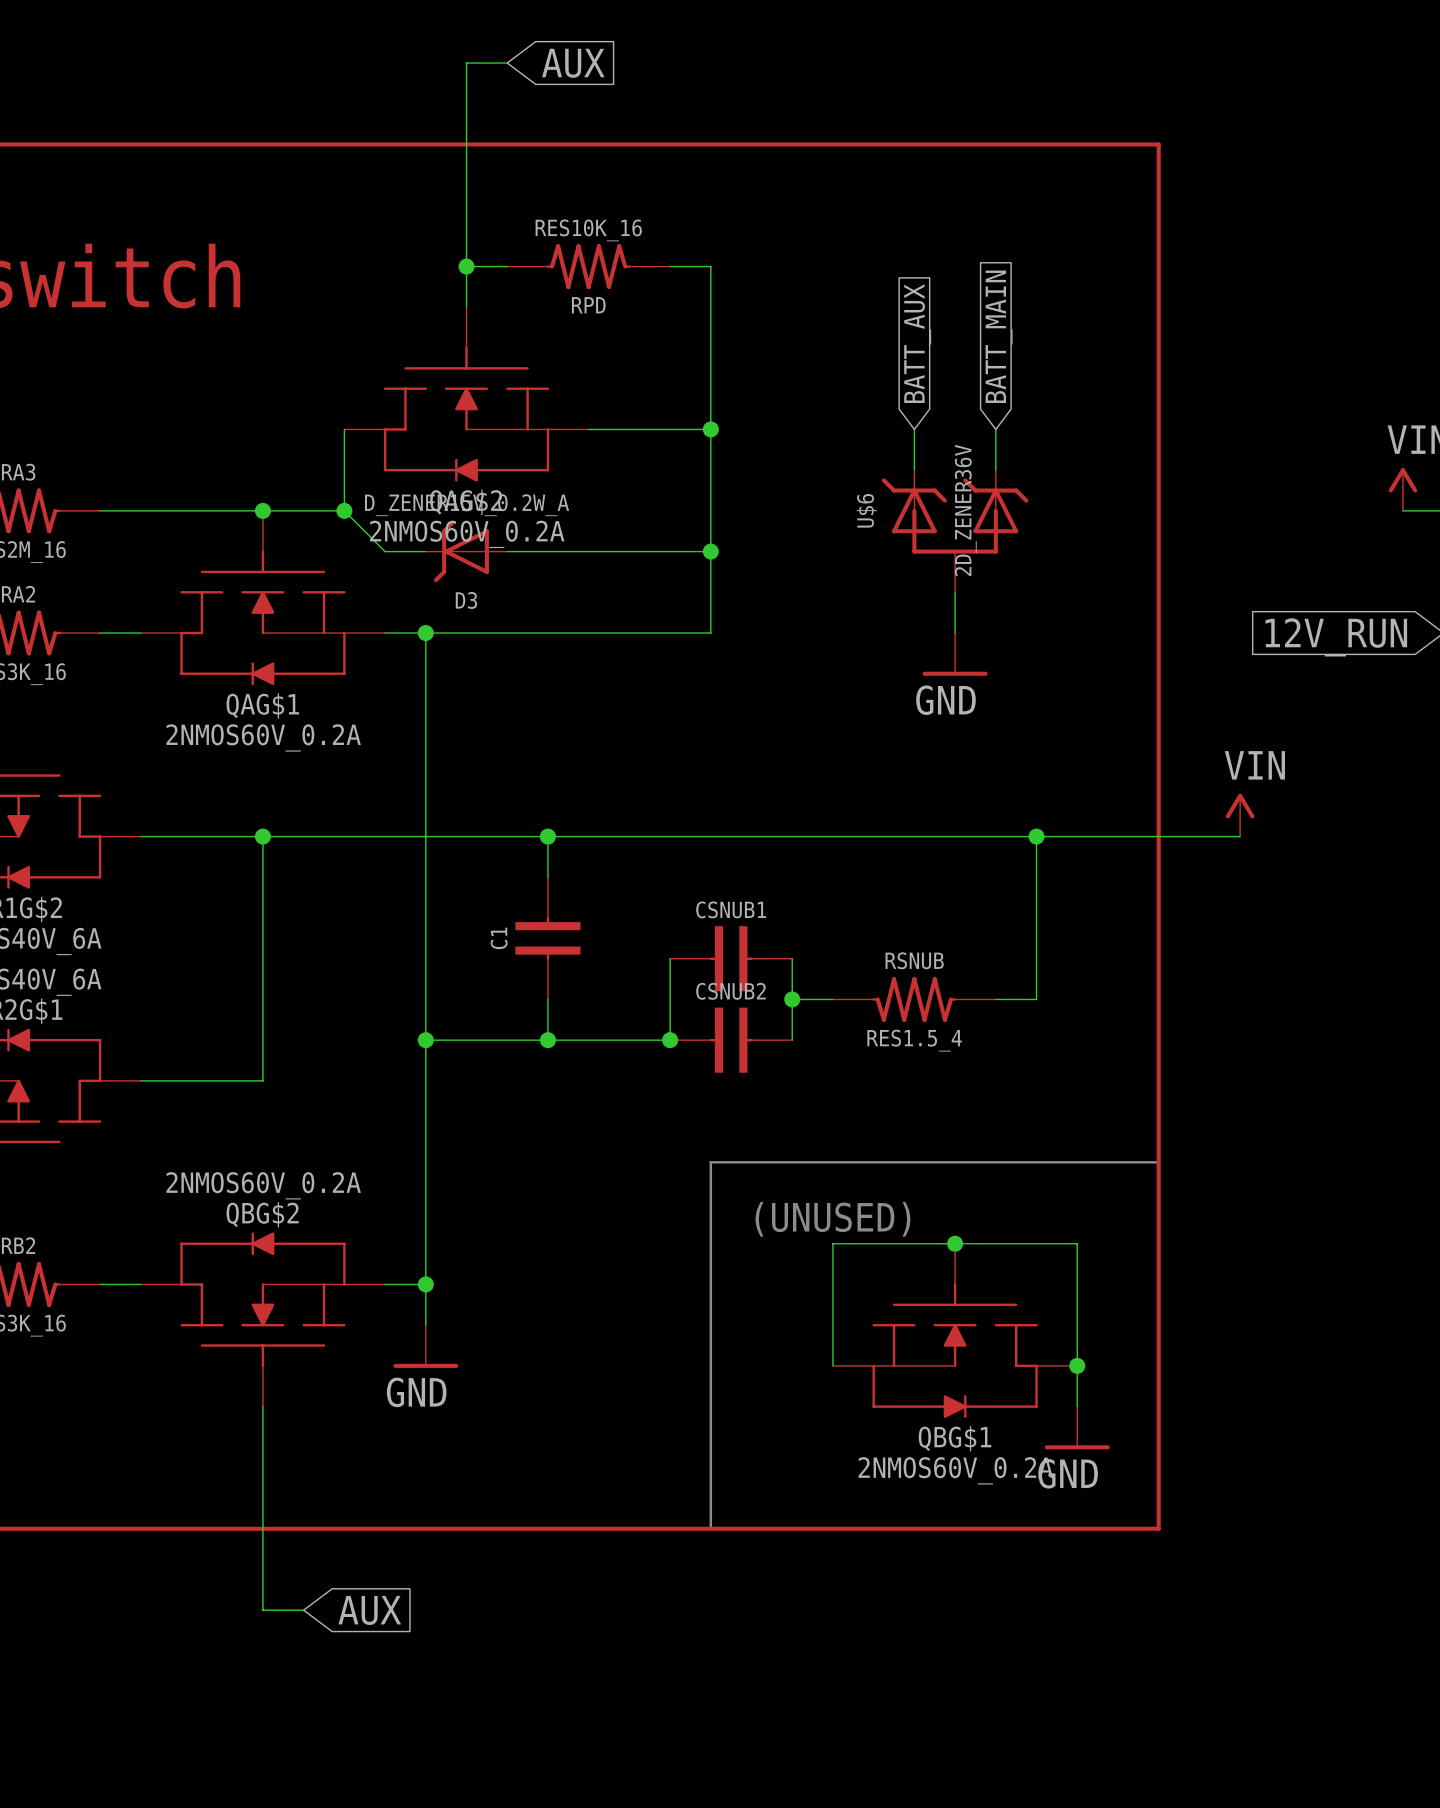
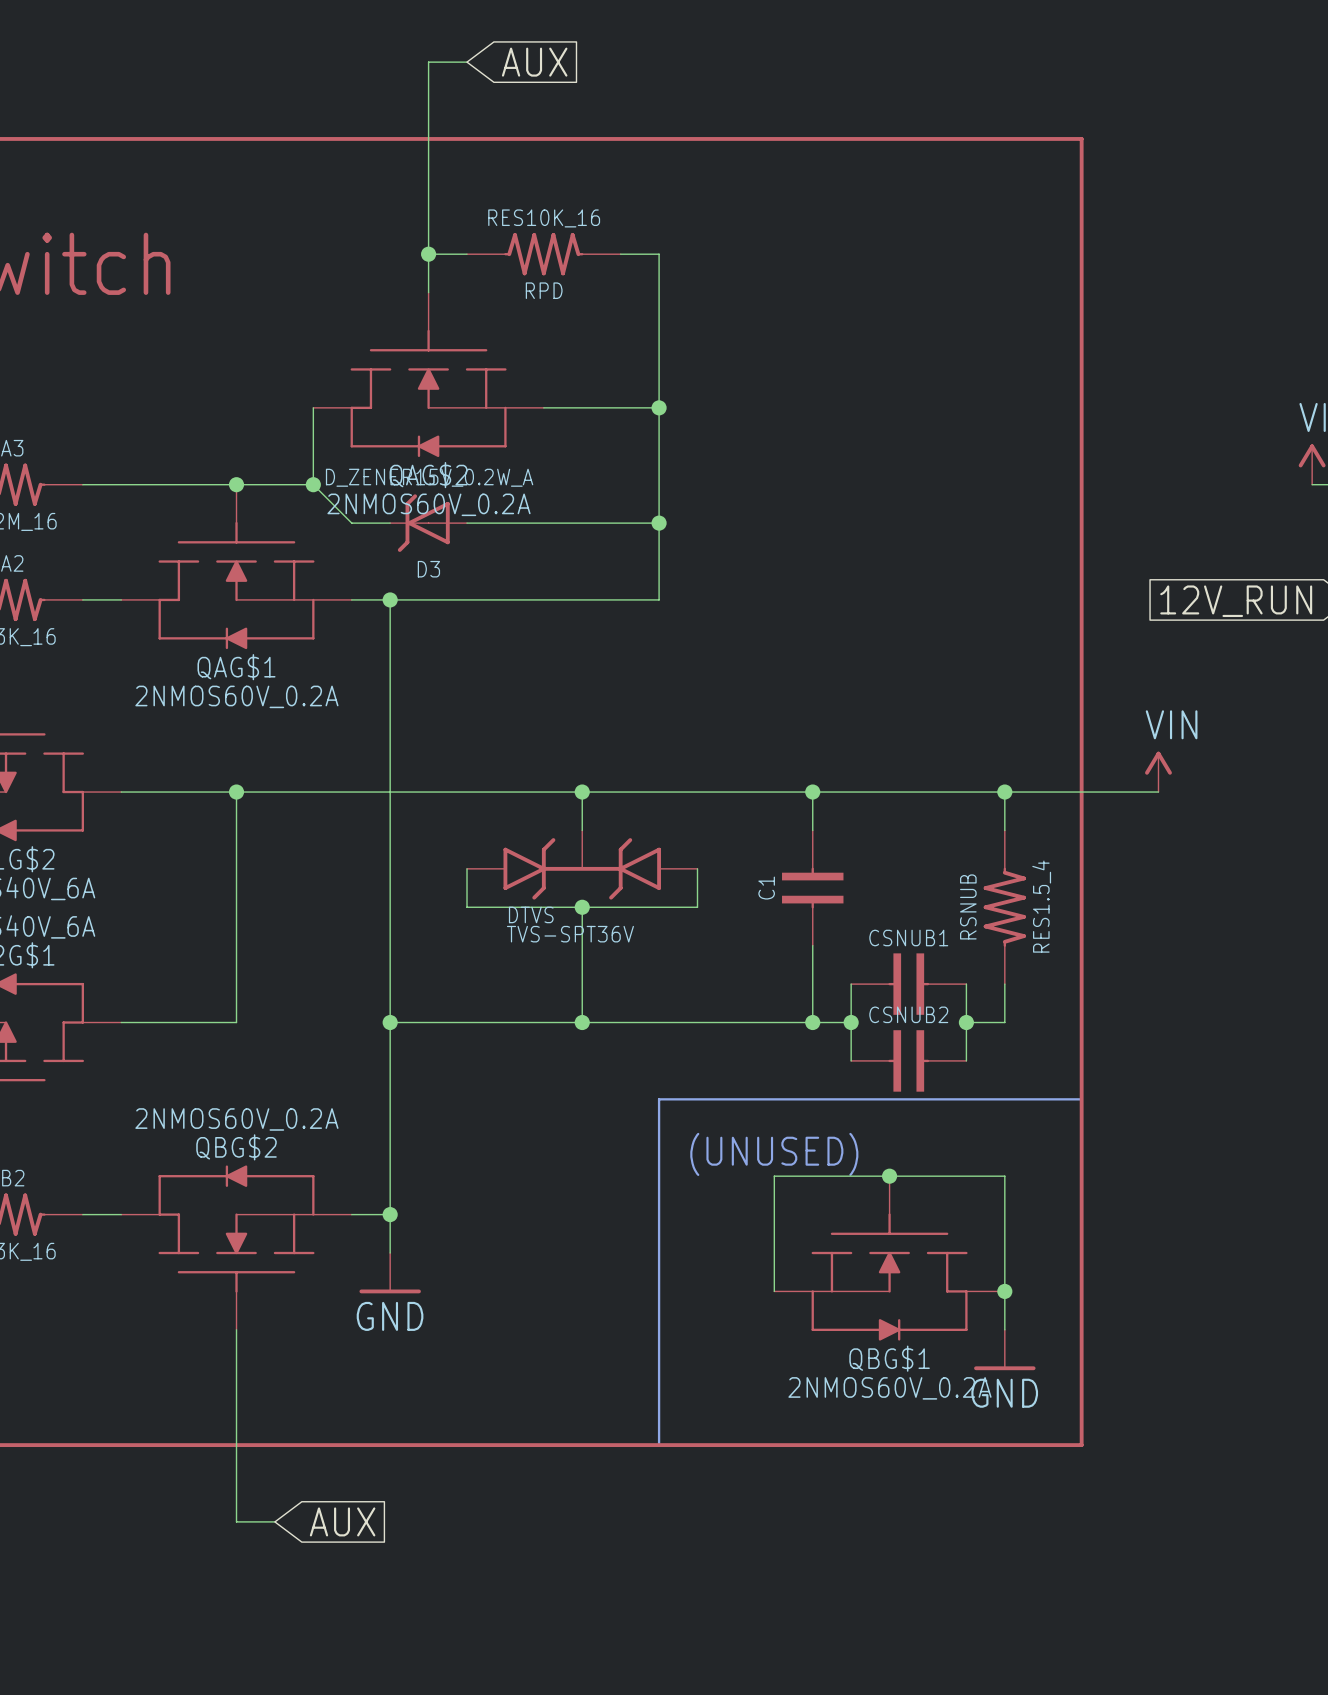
global label: BATT_MAIN (999, 336) -> none
global label: BATT_AUX (917, 343) -> none
wire: (914, 429) (914, 470) -> none
wire: (995, 429) (995, 470) -> none
U$6: 2D_ZENER36V (955, 531) -> none
wire: (955, 592) (955, 633) -> (812, 792) (812, 830)
power symbol: GND (955, 654) -> none
wire: (547, 836) (547, 877) -> (582, 792) (582, 830)
junction: (547, 836) -> none
junction: none -> (582, 792)
junction: none -> (812, 792)
wire: (1036, 836) (1036, 999) (995, 999) -> none
junction position: (1036, 836) -> (1004, 792)
wire: none -> (1004, 792) (1004, 830)
DTVS: none -> TVS-SPT36V (582, 865)
wire: none -> (467, 868) (467, 907) (697, 907) (697, 868)
C1 position: (547, 938) -> (812, 888)
wire: none -> (582, 907) (582, 1022)
junction: none -> (582, 907)
wire: (670, 958) (670, 1040) (425, 1040) -> none
CSNUB1 position: (731, 958) -> (908, 984)
wire: (792, 958) (792, 1040) -> (812, 945) (812, 1022)
wire: (547, 999) (547, 1040) -> none
wire: (792, 999) (832, 999) -> none
junction: (792, 999) -> none
RSNUB rotation: 0° (914, 999) -> 90° counterclockwise (1004, 907)
RSNUB position: (914, 999) -> (1004, 907)
junction position: (425, 1040) -> (390, 1022)
junction: (547, 1040) -> none
junction: (670, 1040) -> none
CSNUB2 position: (731, 1040) -> (908, 1060)
wire: none -> (851, 984) (851, 1060)
wire: none -> (966, 984) (966, 1060)
wire: none -> (1004, 984) (1004, 1022) (966, 1022)
wire: none -> (390, 1022) (851, 1022)
junction: none -> (582, 1022)
junction: none -> (812, 1022)
junction: none -> (851, 1022)
junction: none -> (966, 1022)

